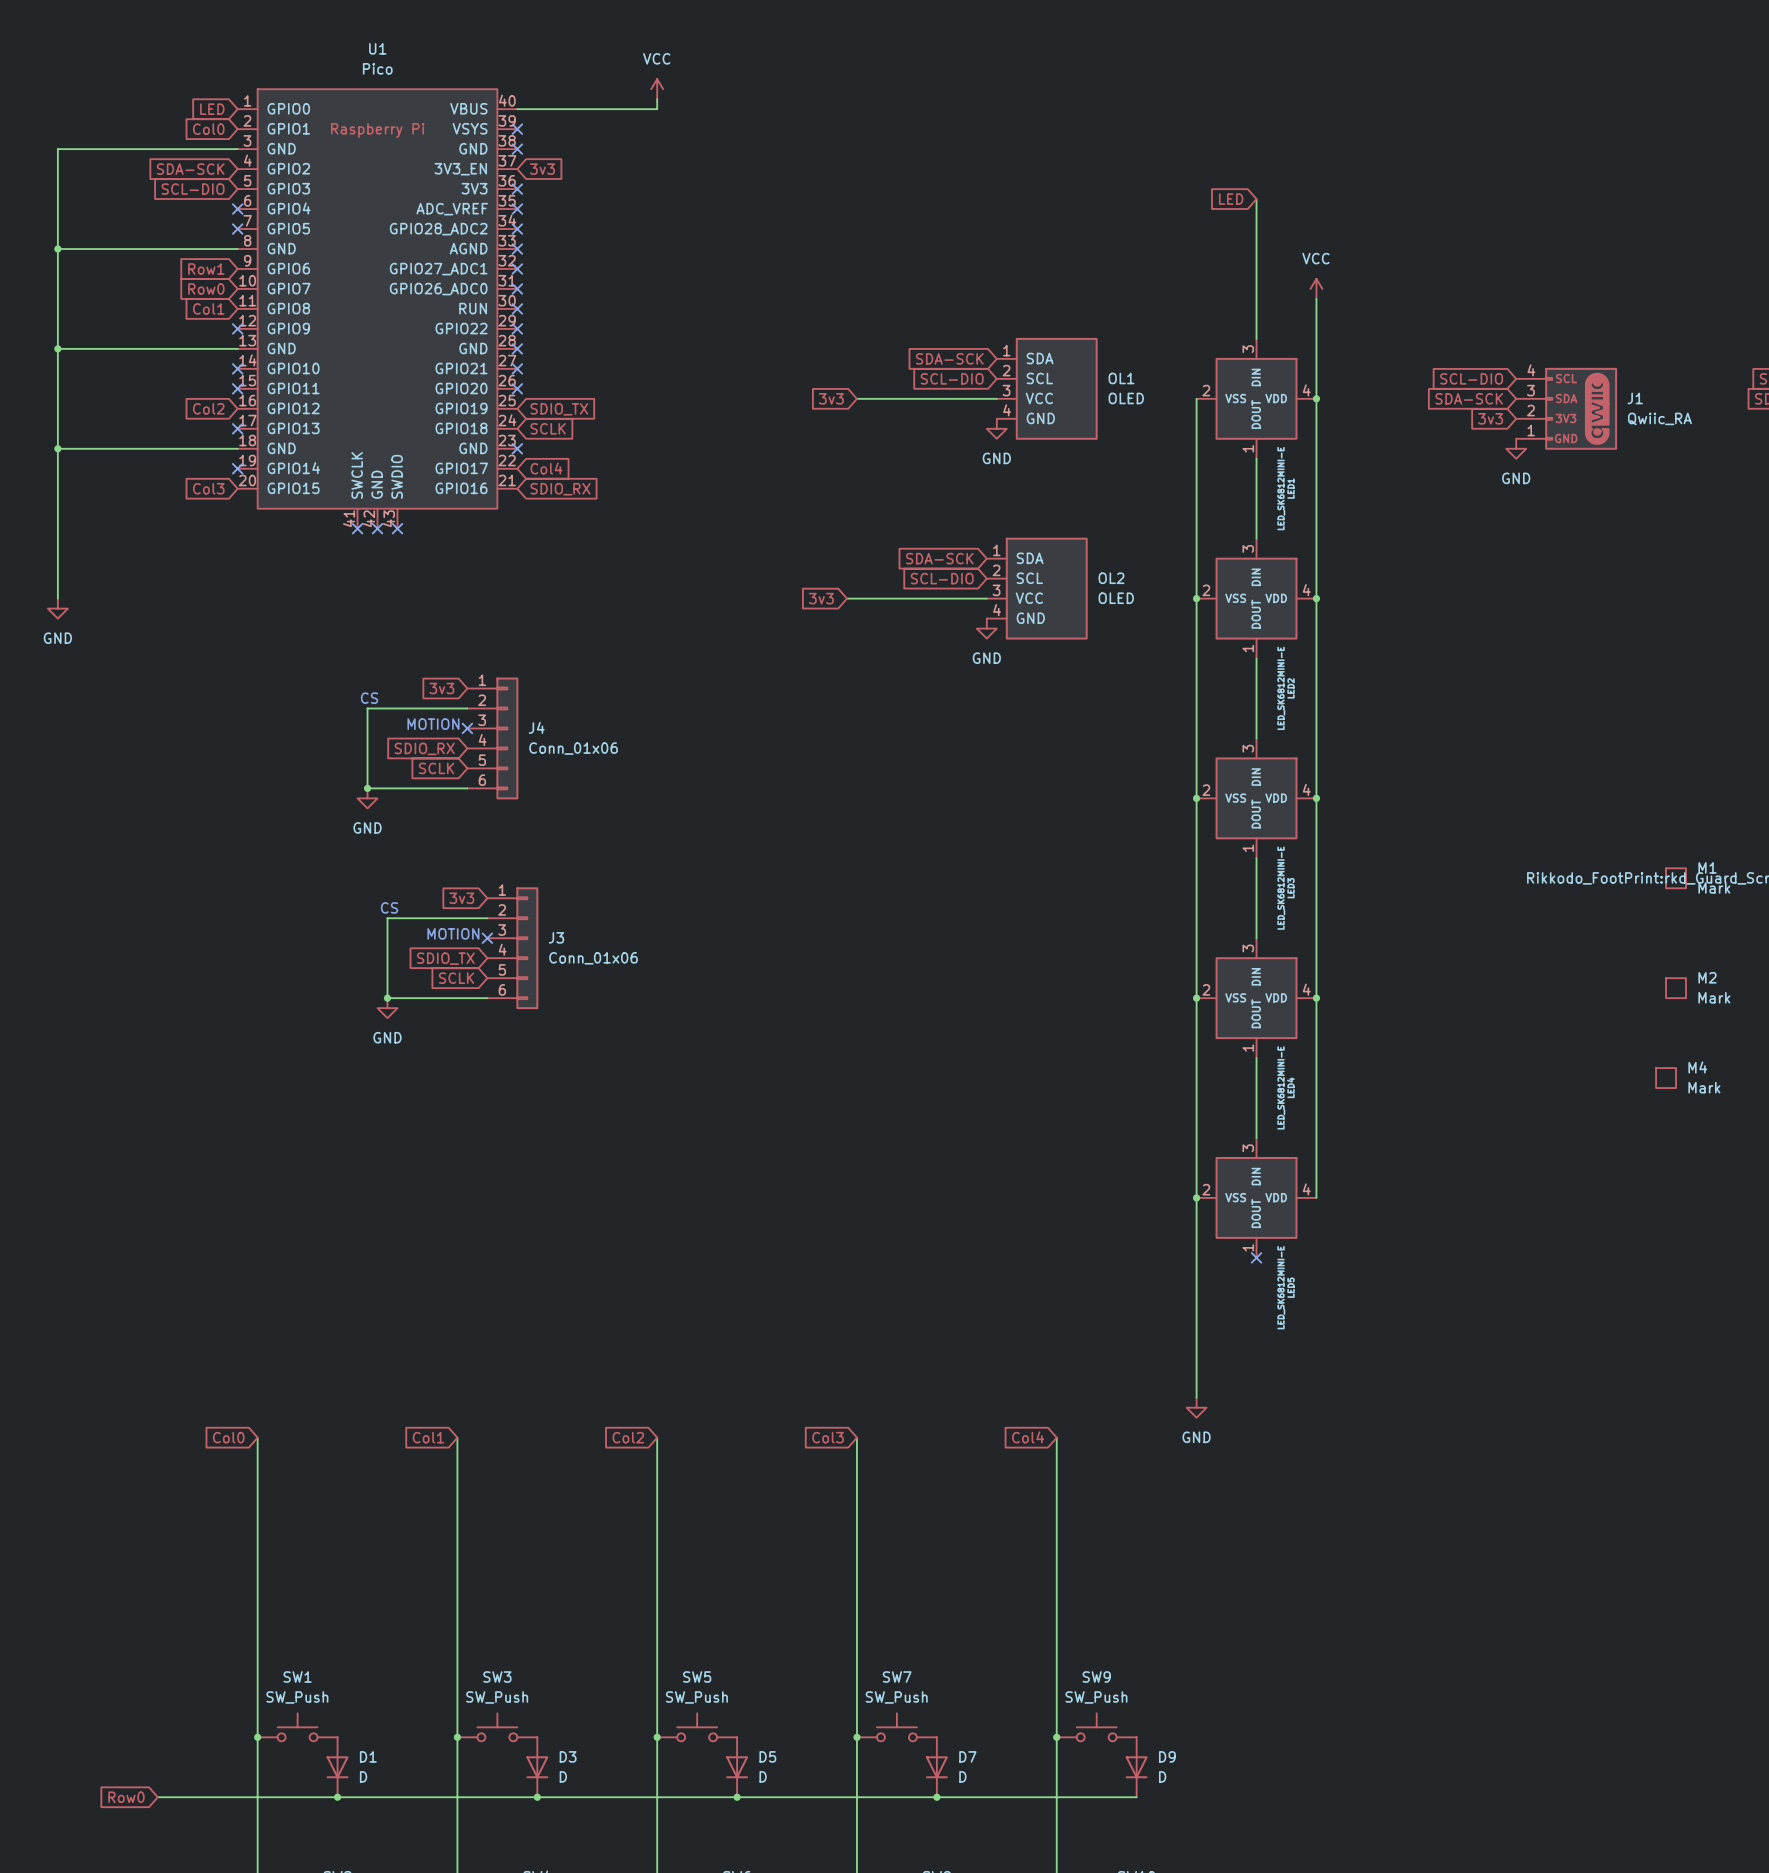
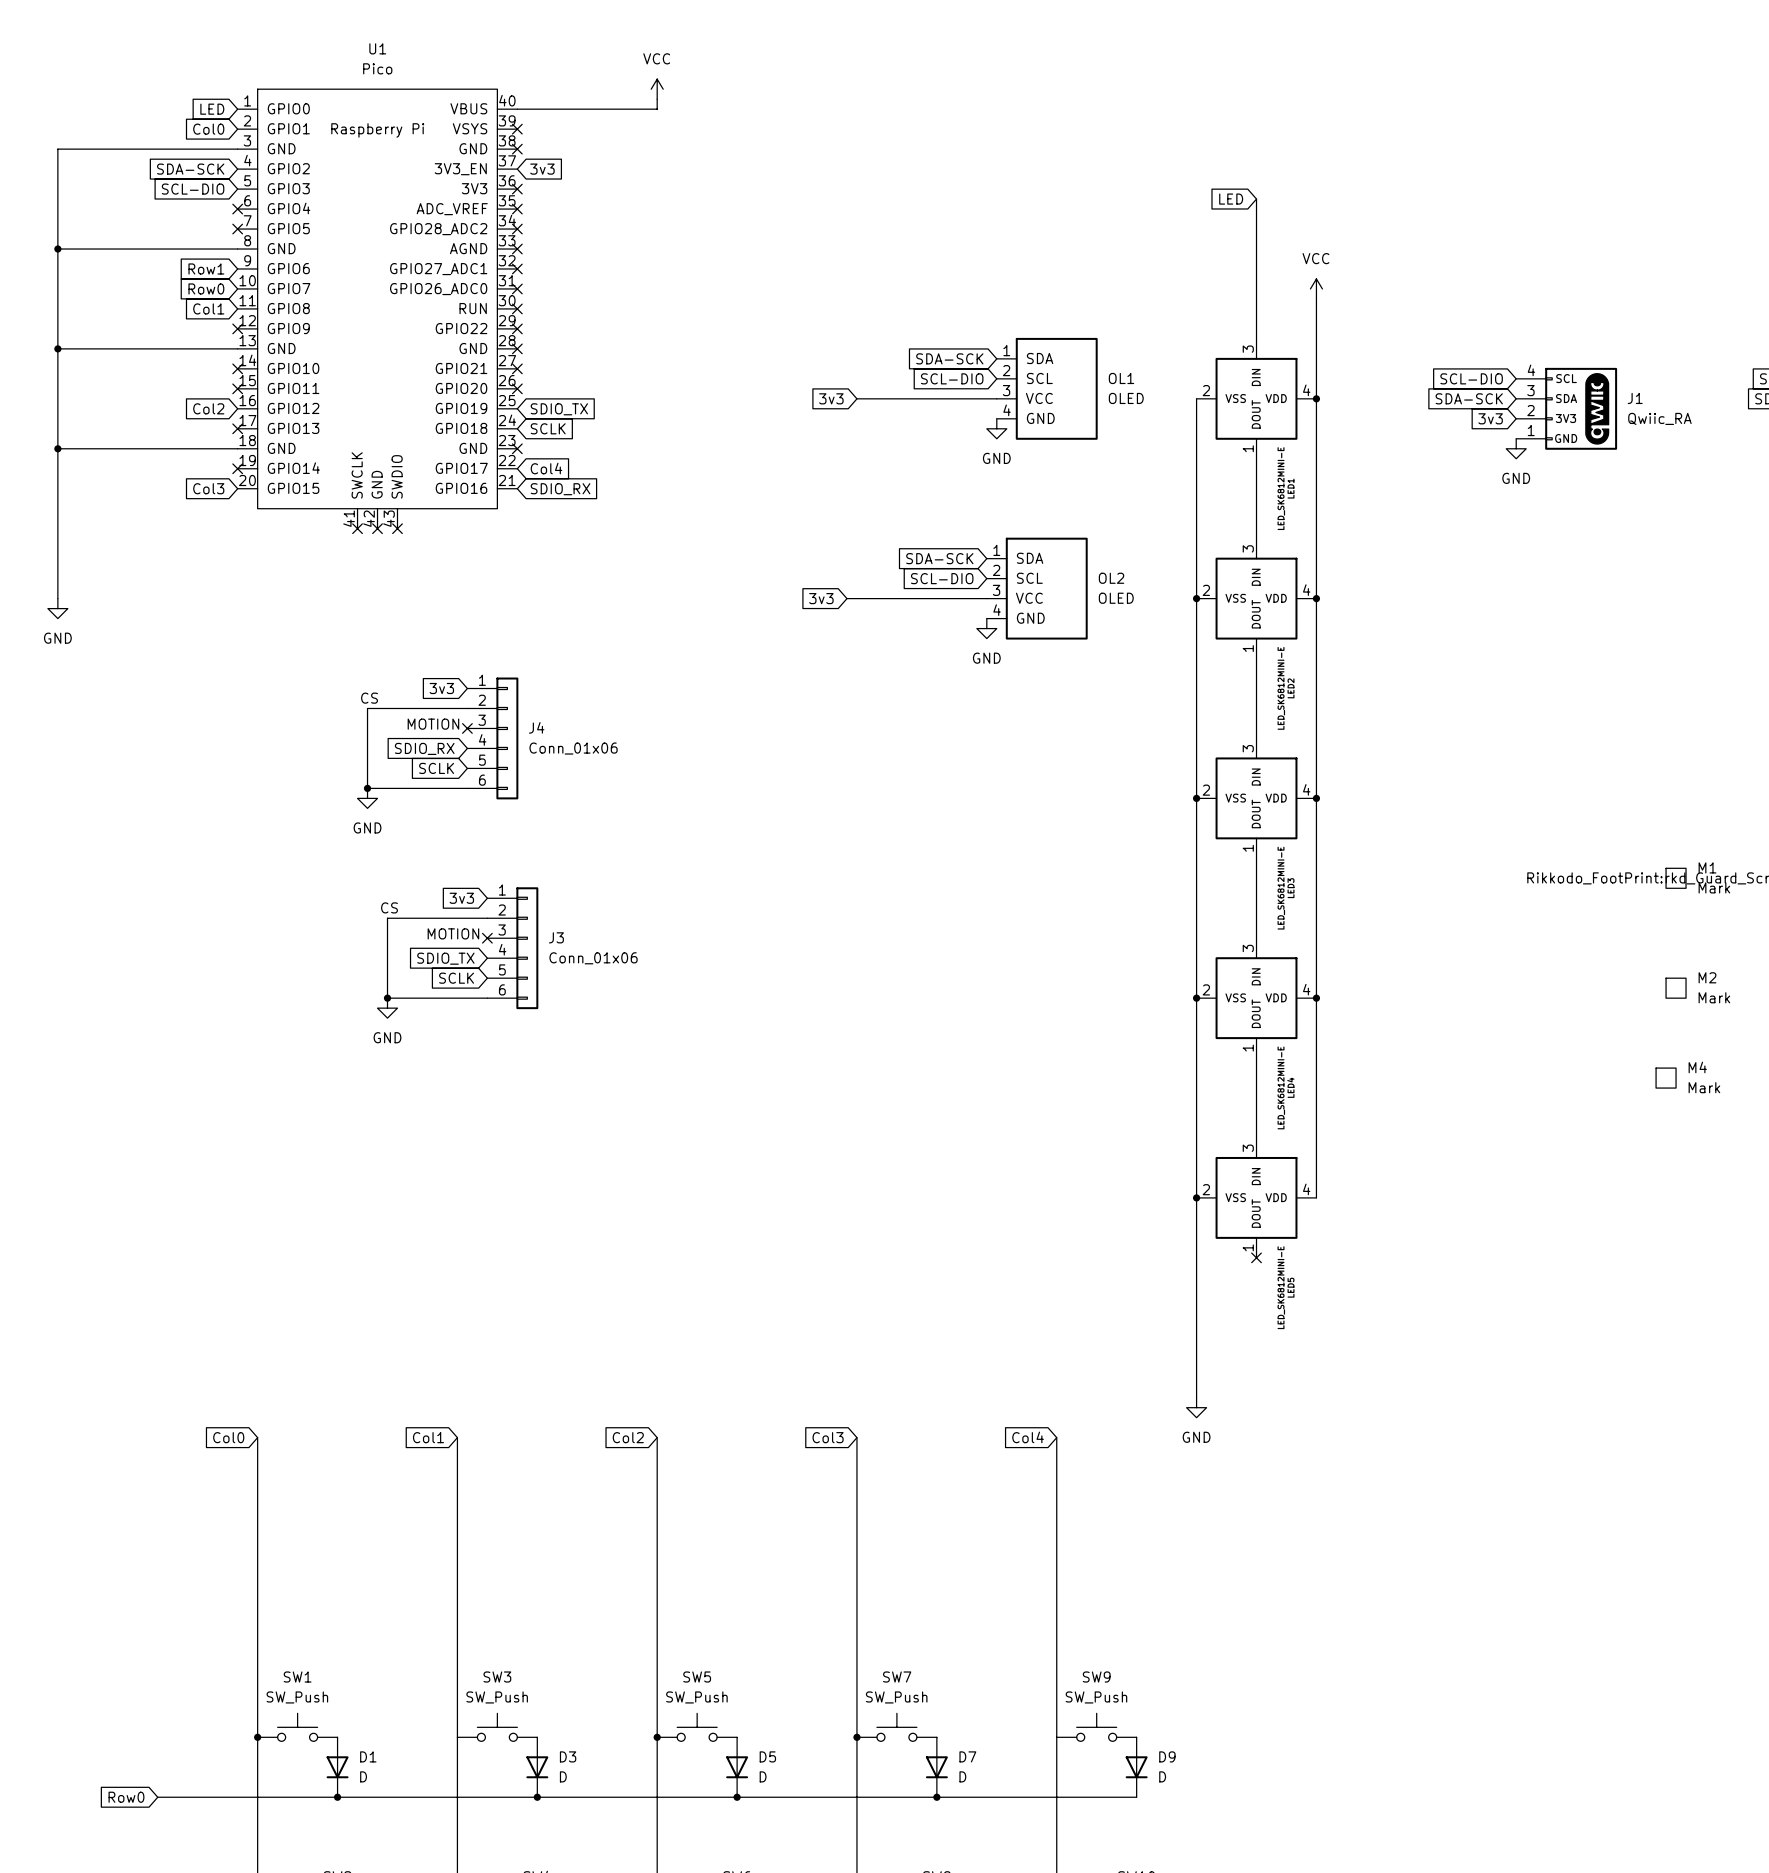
junction: (457, 1737) -> none
junction: (1056, 1737) -> none

